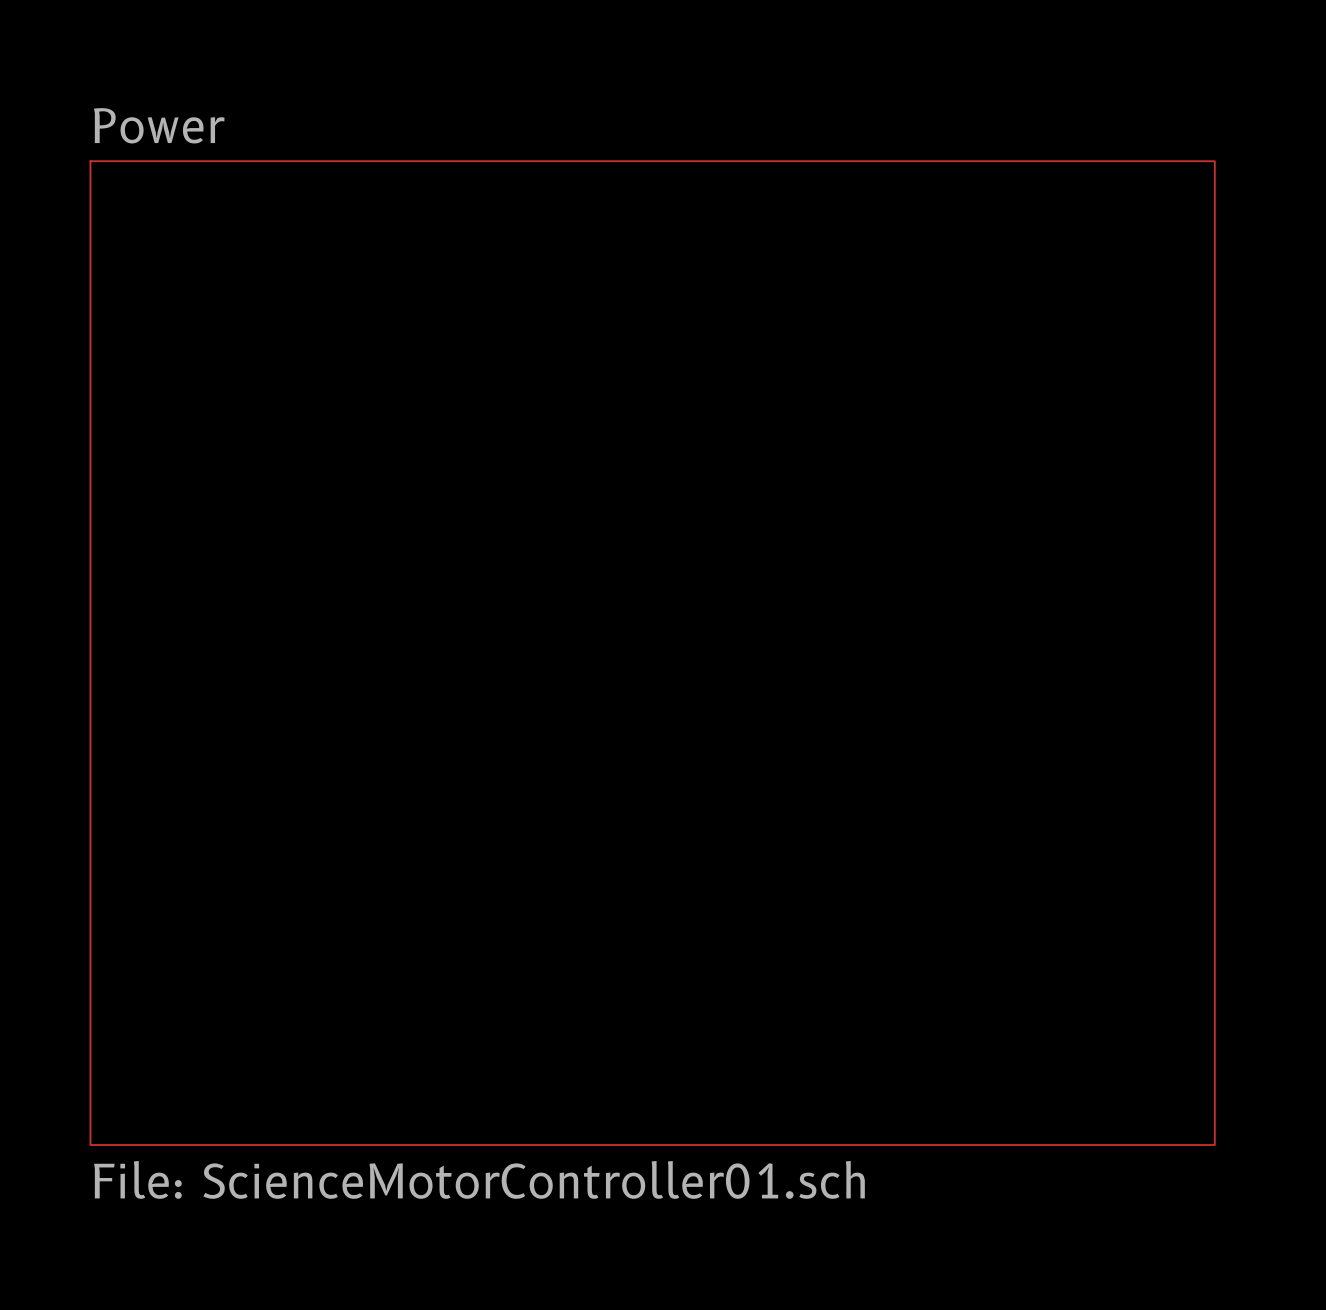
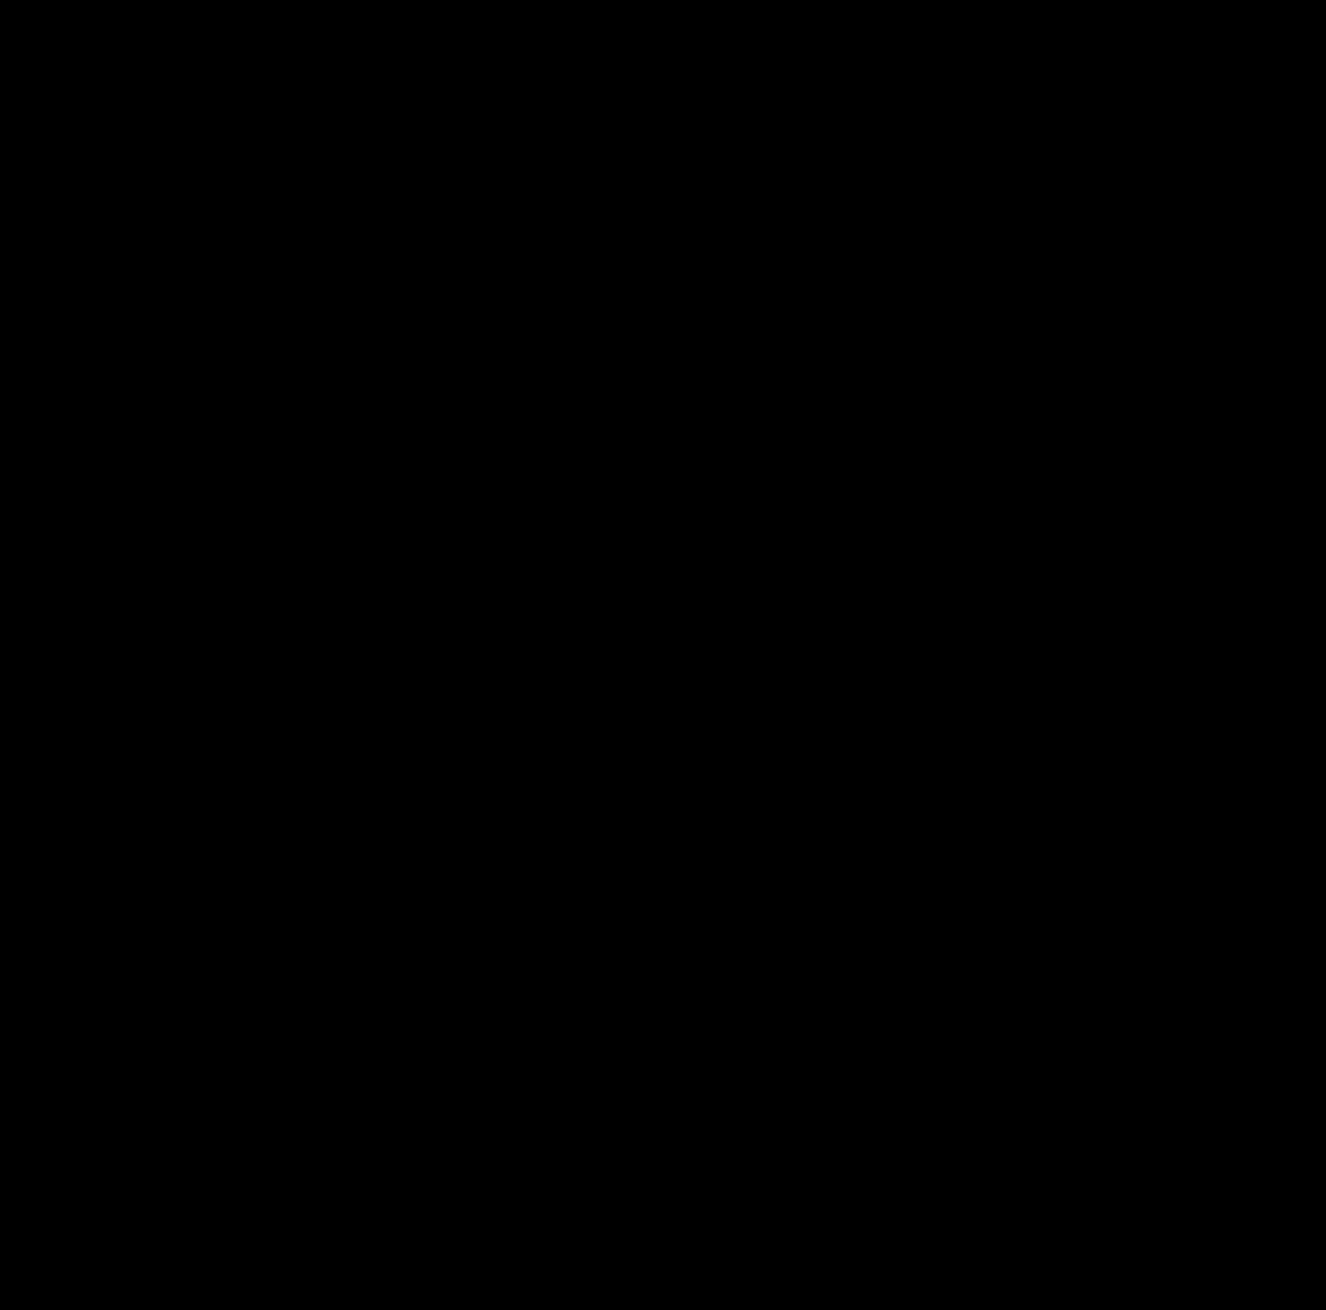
sheet Power: File: ScienceMotorController01.sch (652, 653) -> none

